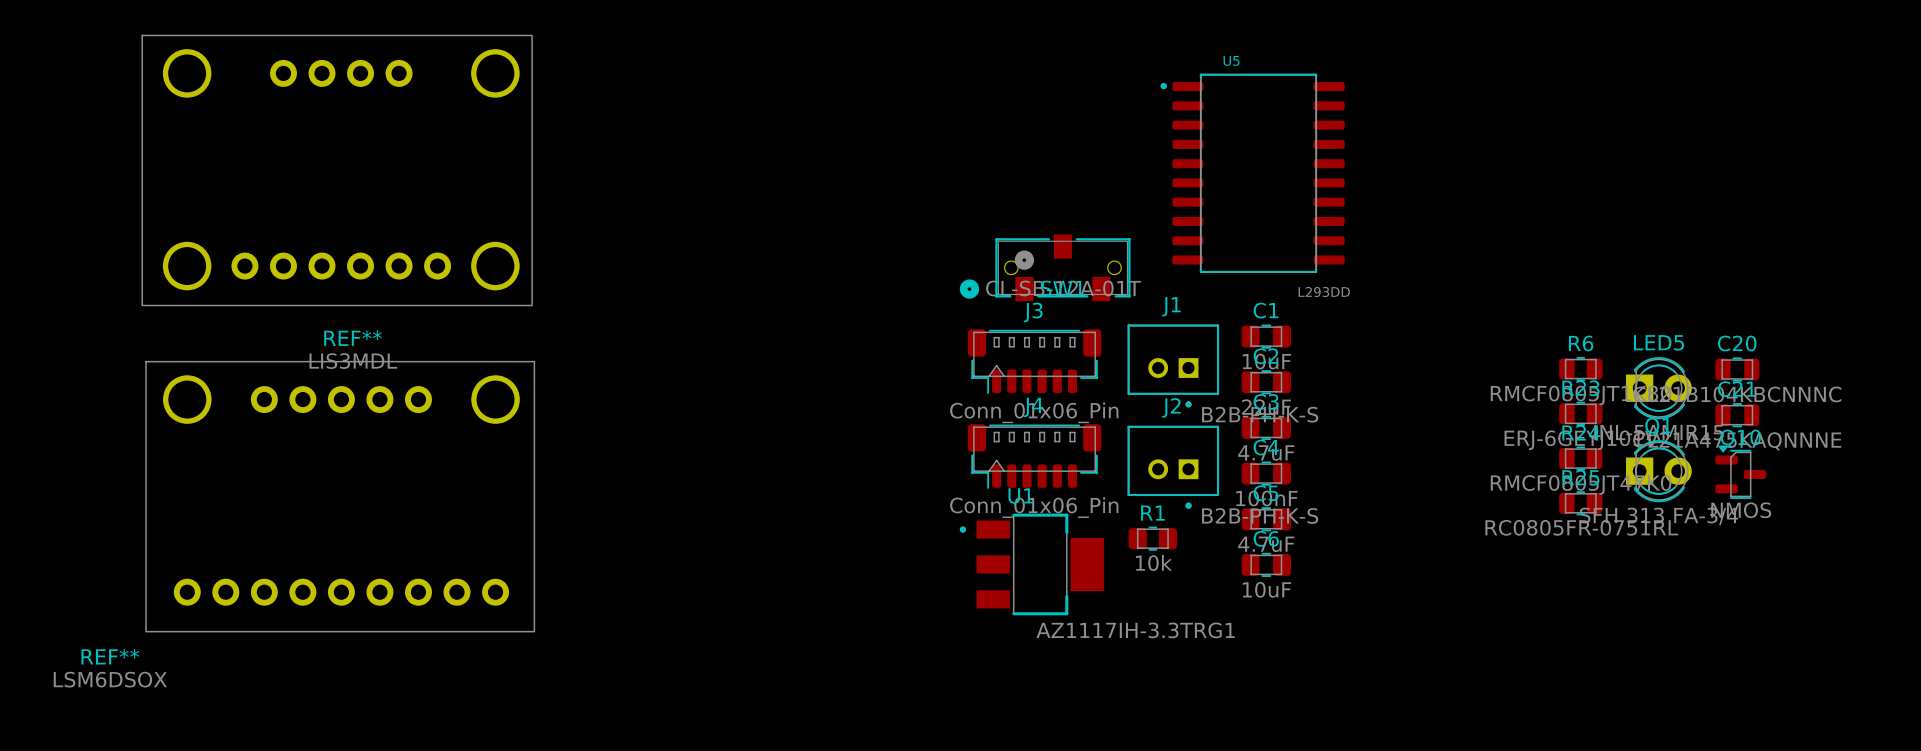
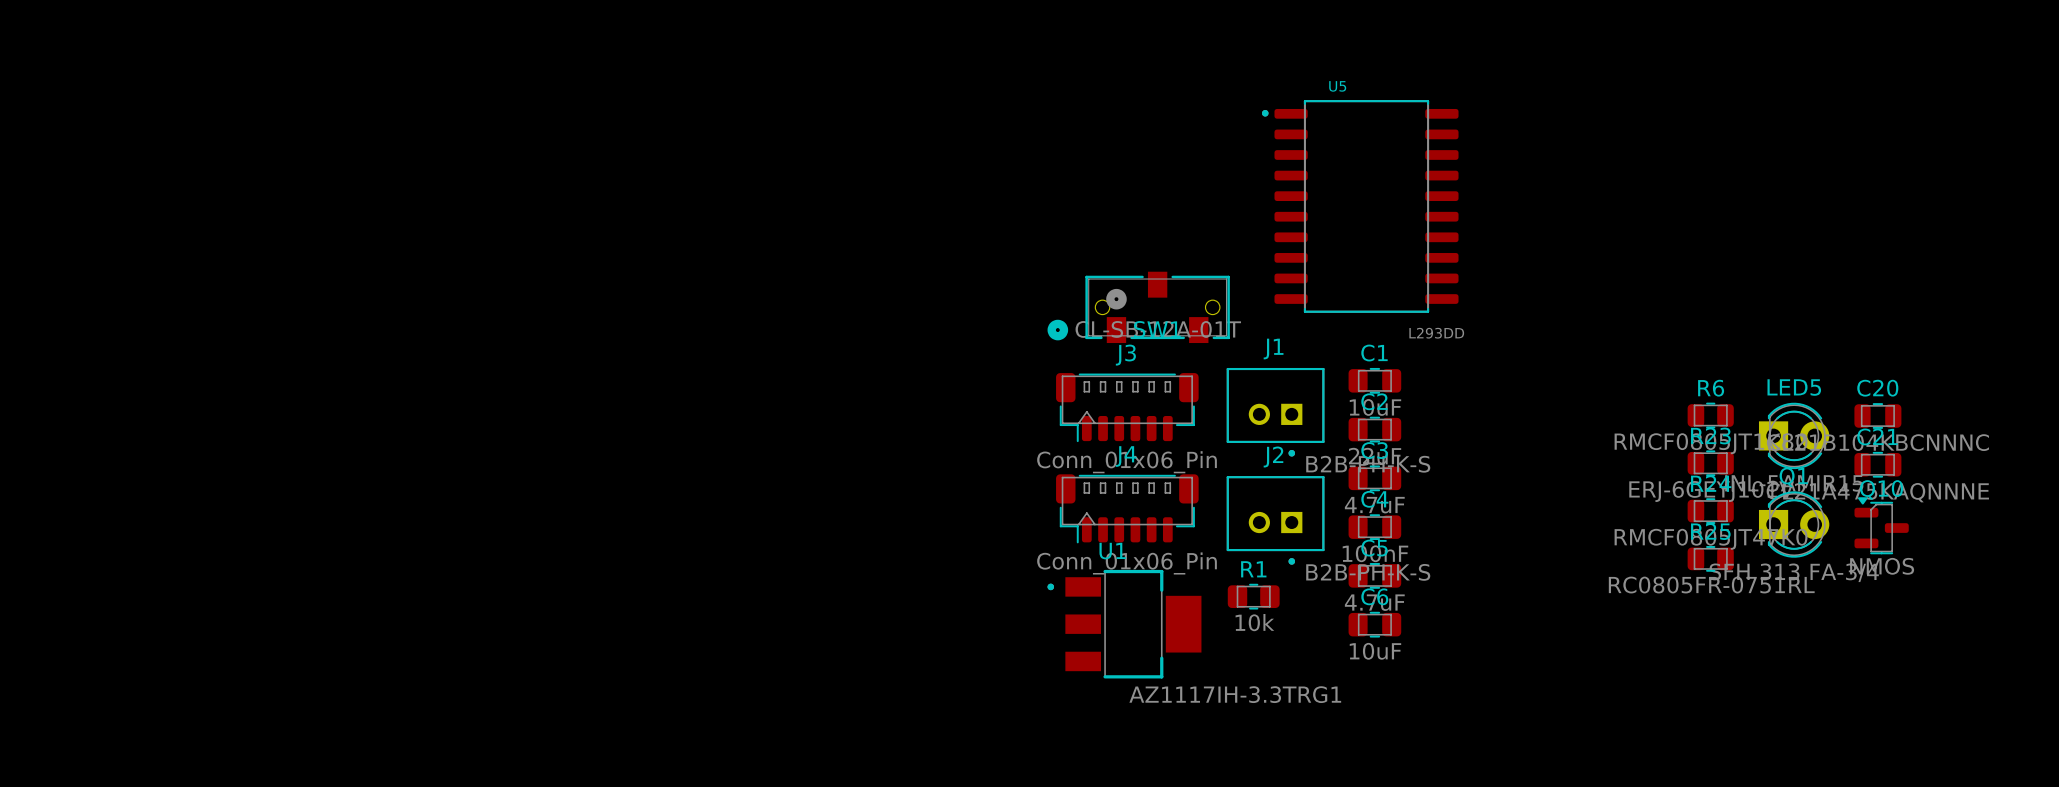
REF**: LIS3MDL (337, 170) -> none
REF**: LSM6DSOX (340, 496) -> none

